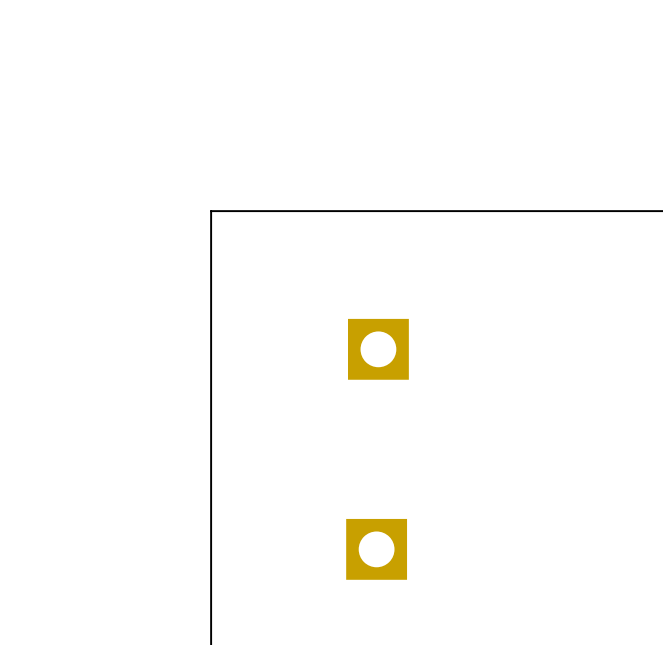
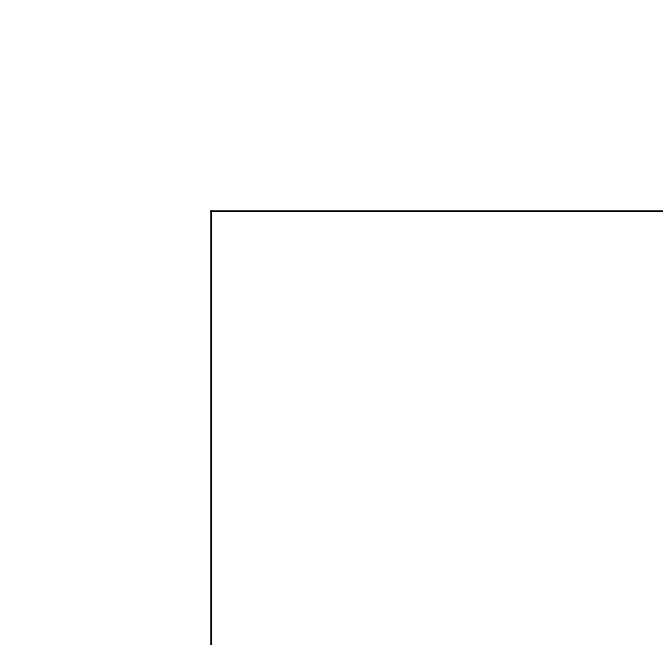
part: (378, 349) -> none
part: (376, 549) -> none

